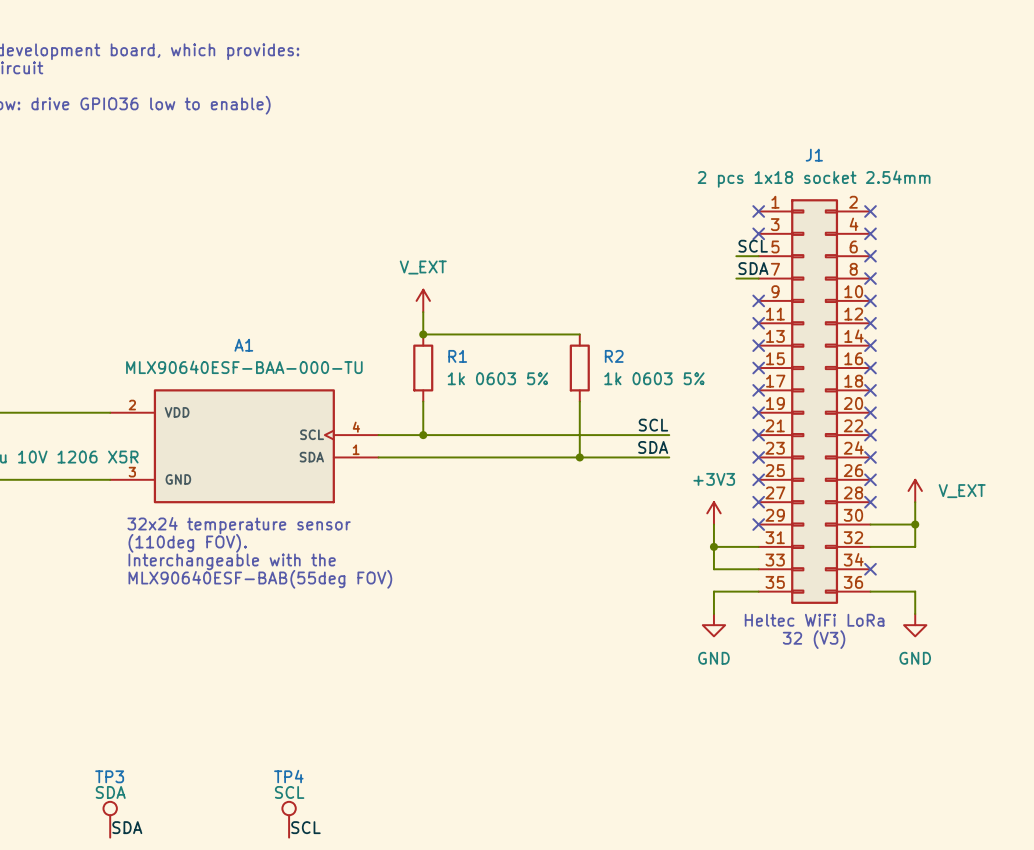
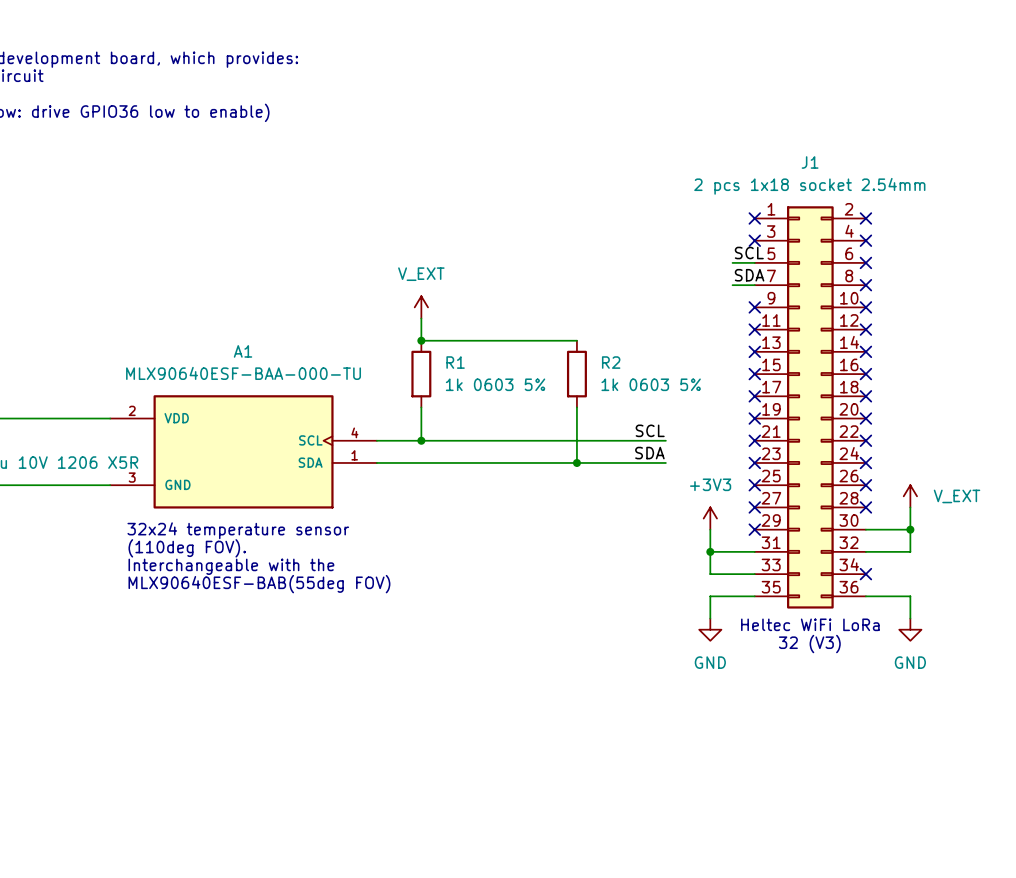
TP3: SDA (110, 819) -> none
TP4: SCL (289, 819) -> none
label: SDA (127, 827) -> none
label: SCL (305, 827) -> none

